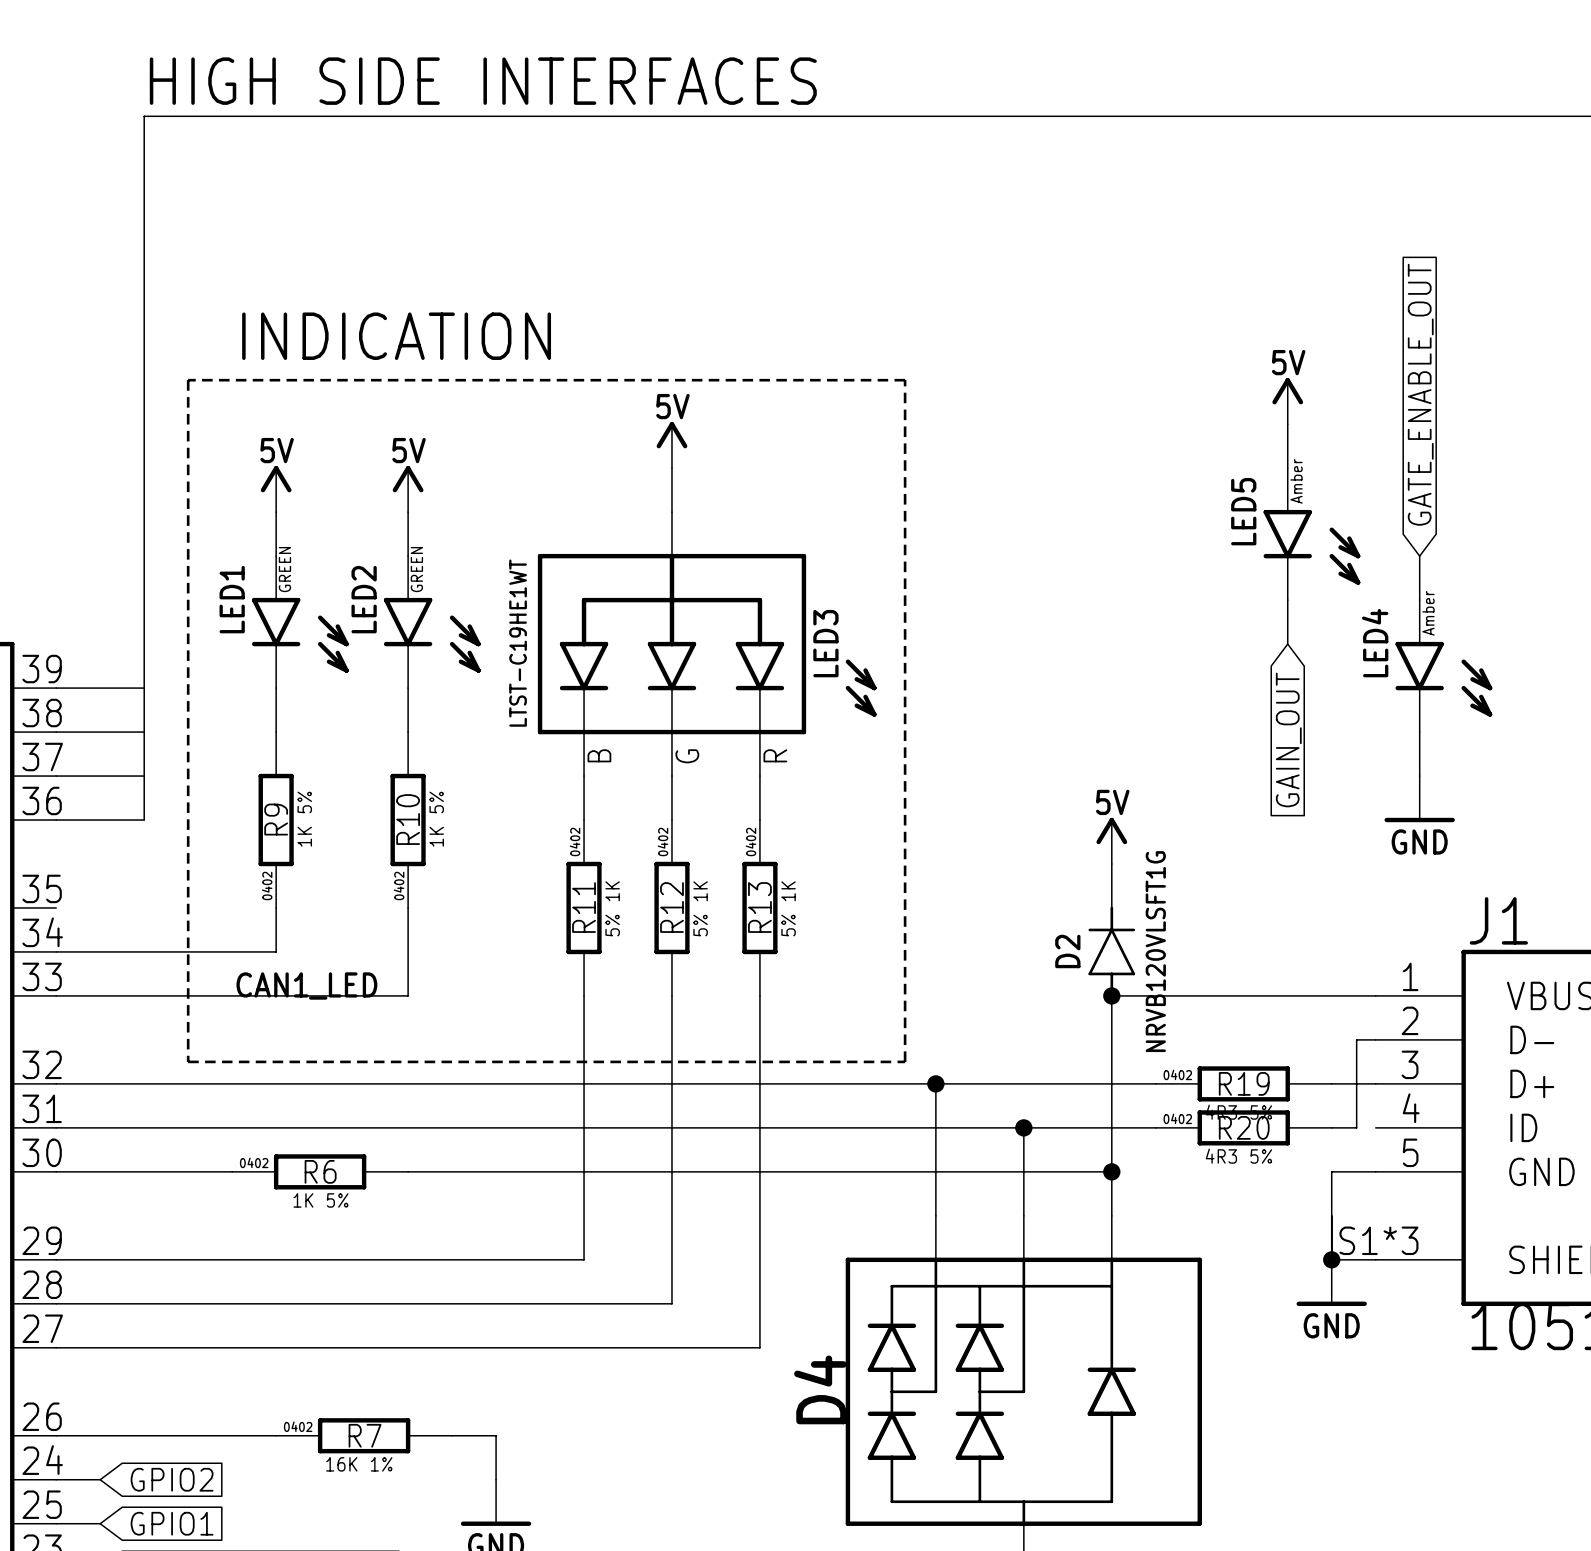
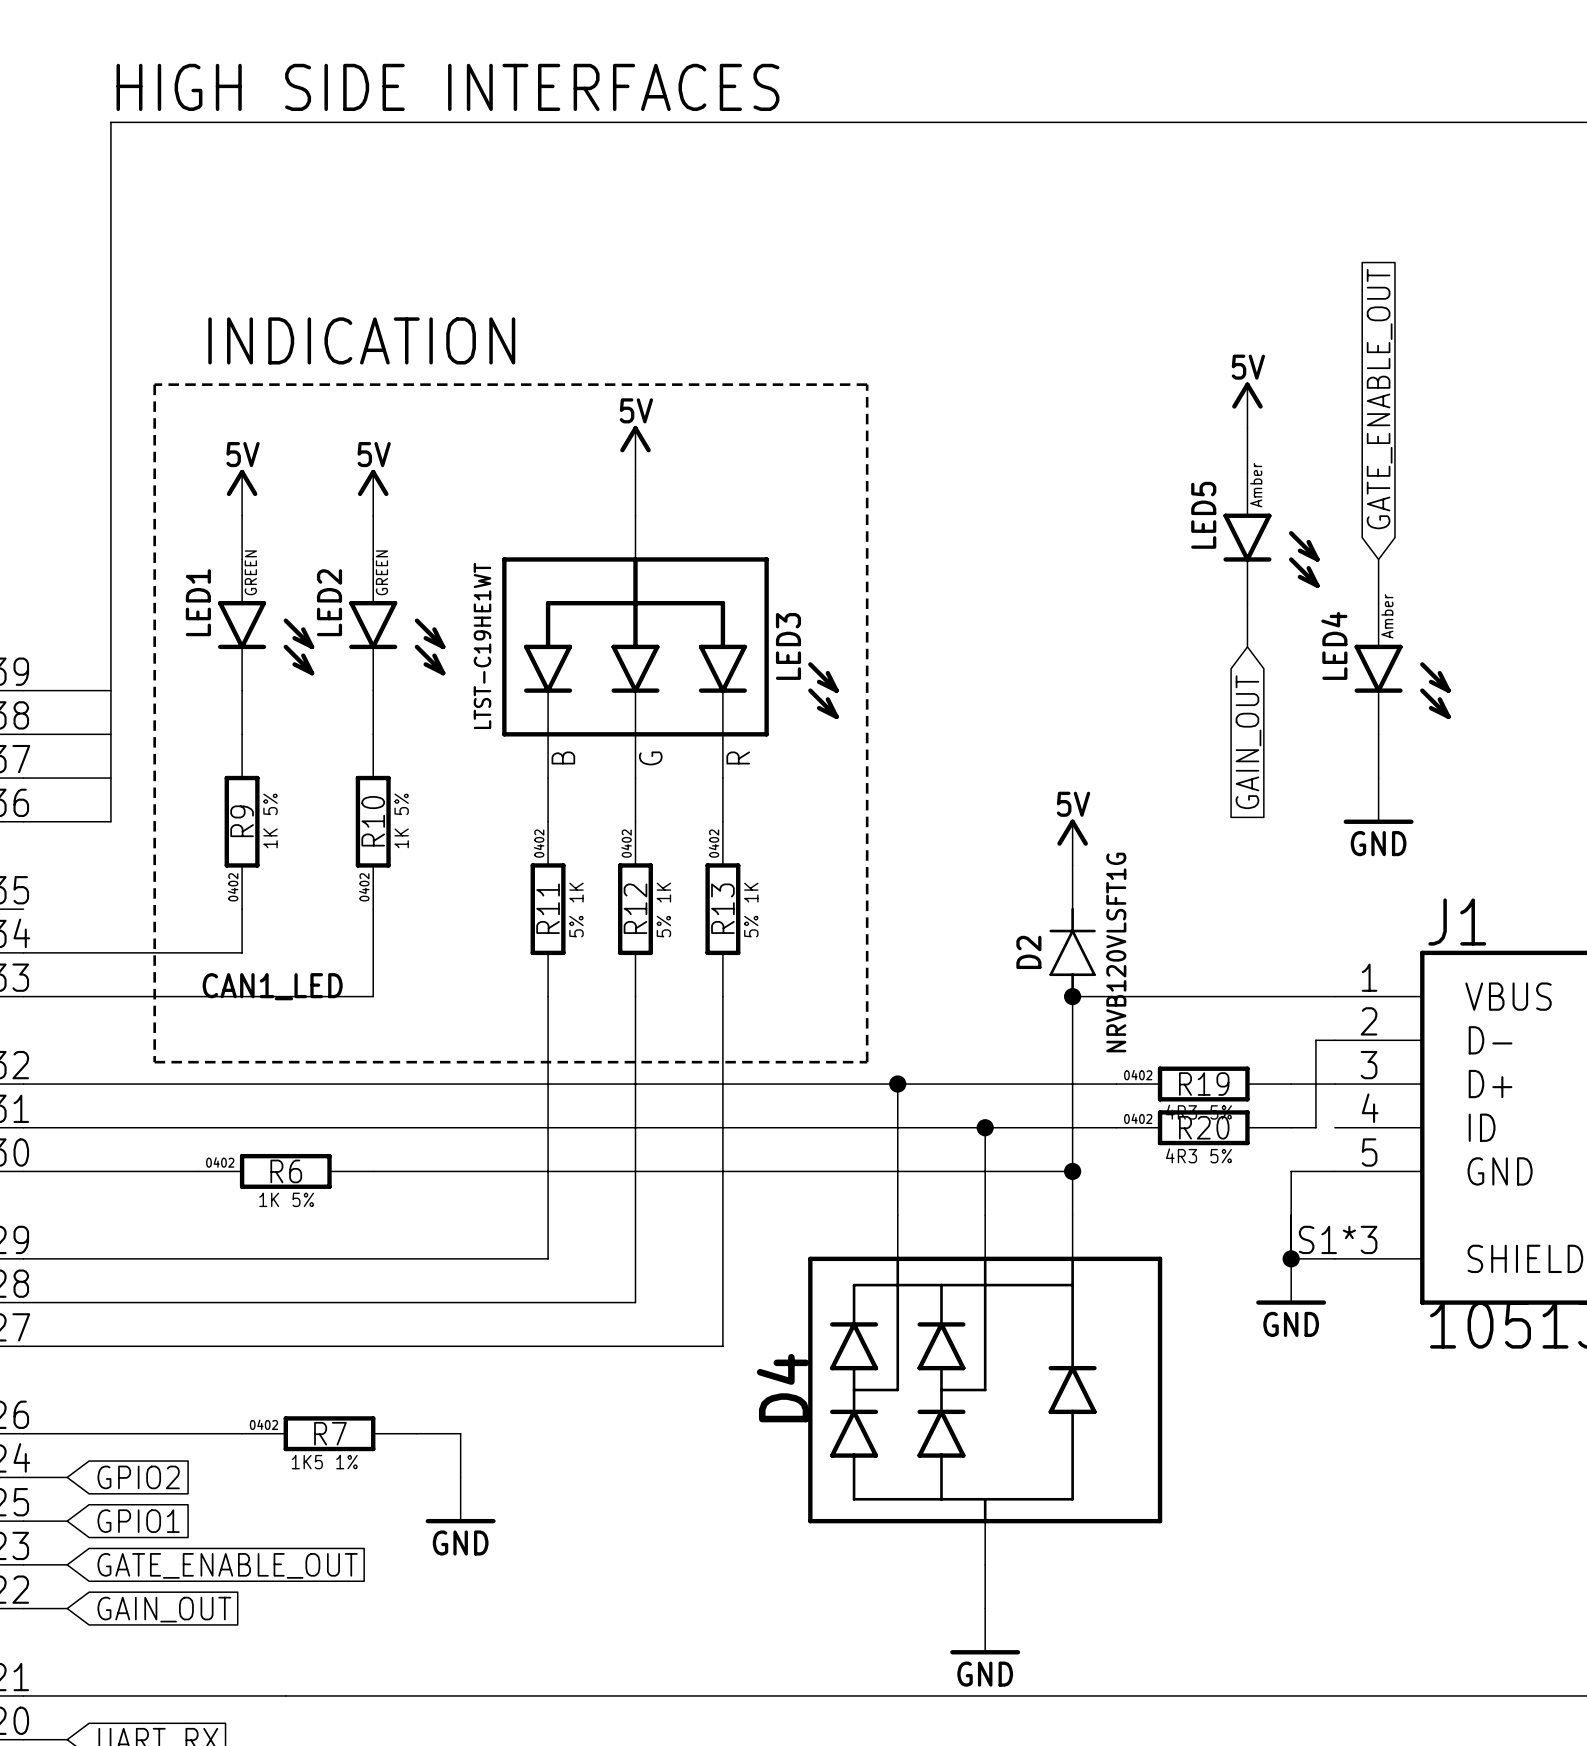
R7 value: 16K (341, 1464) -> 1K5 (307, 1462)

